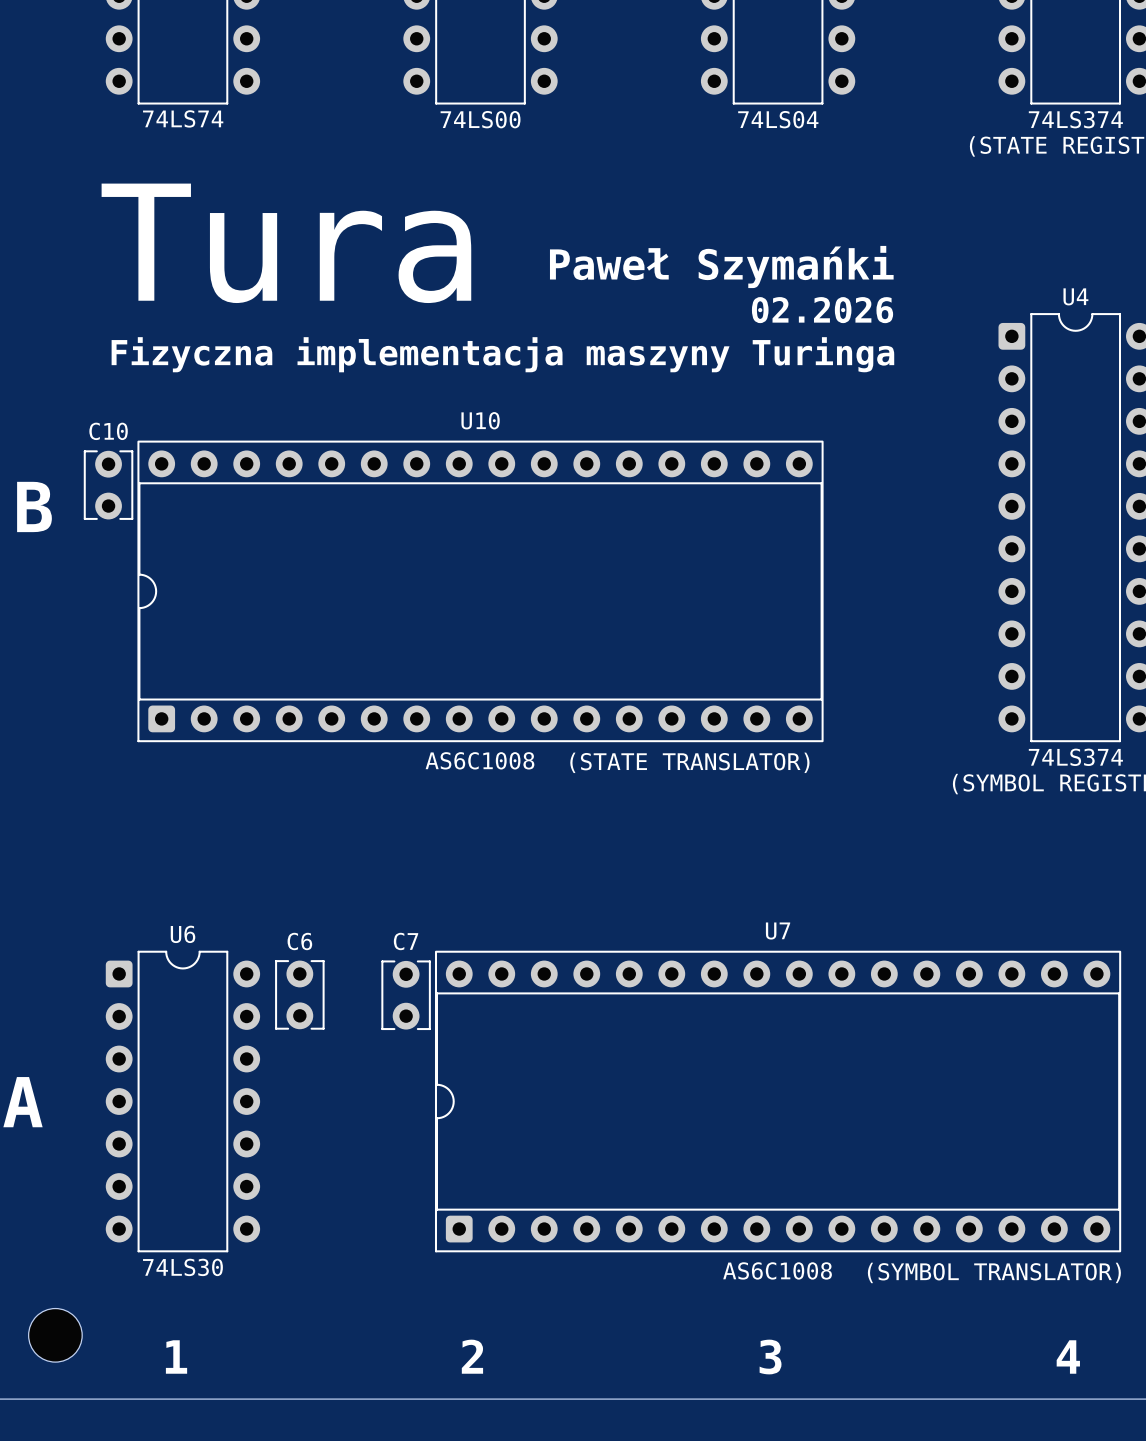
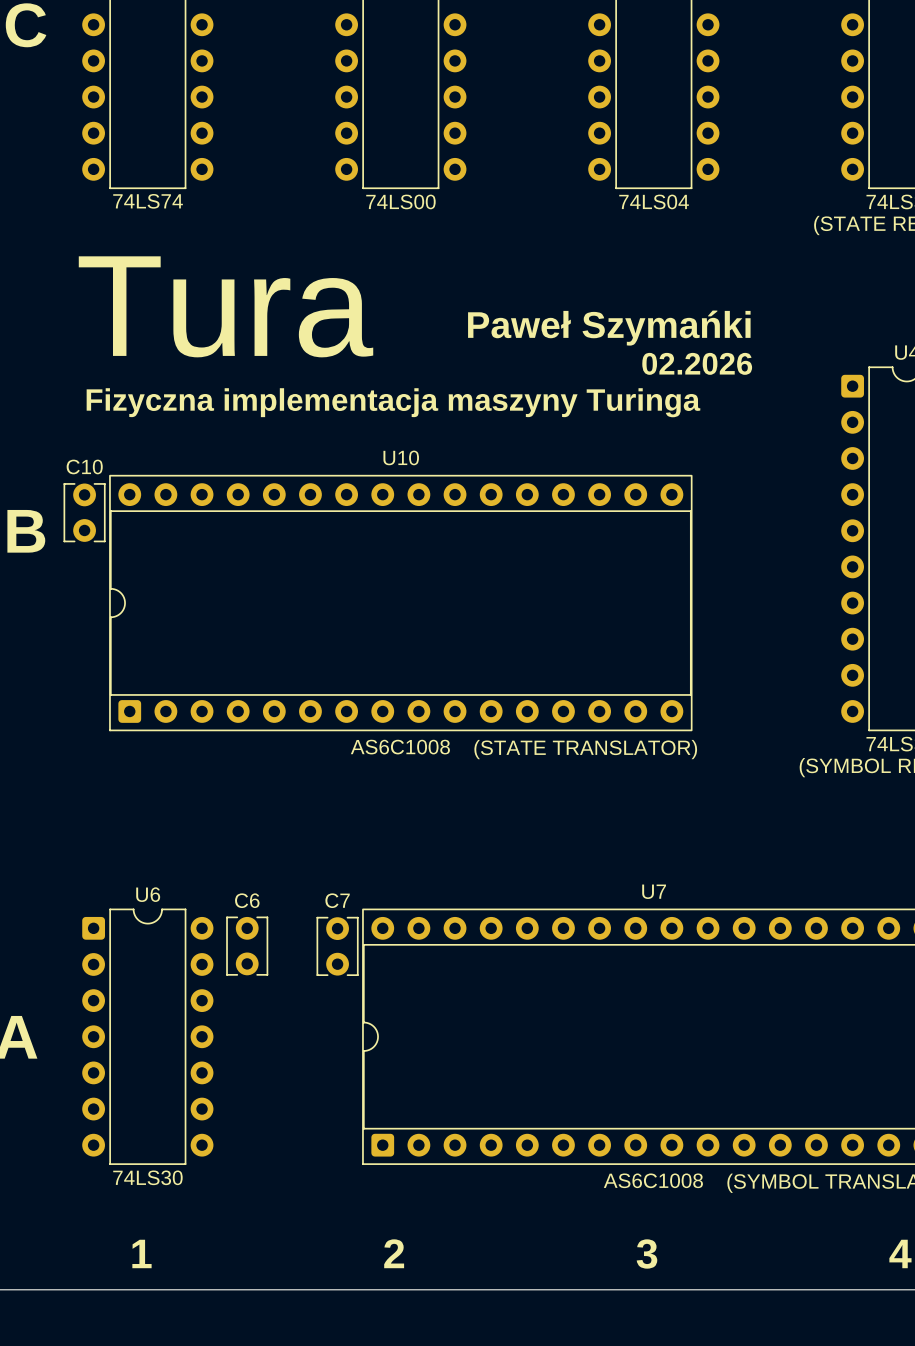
part: (55, 1335) -> none

